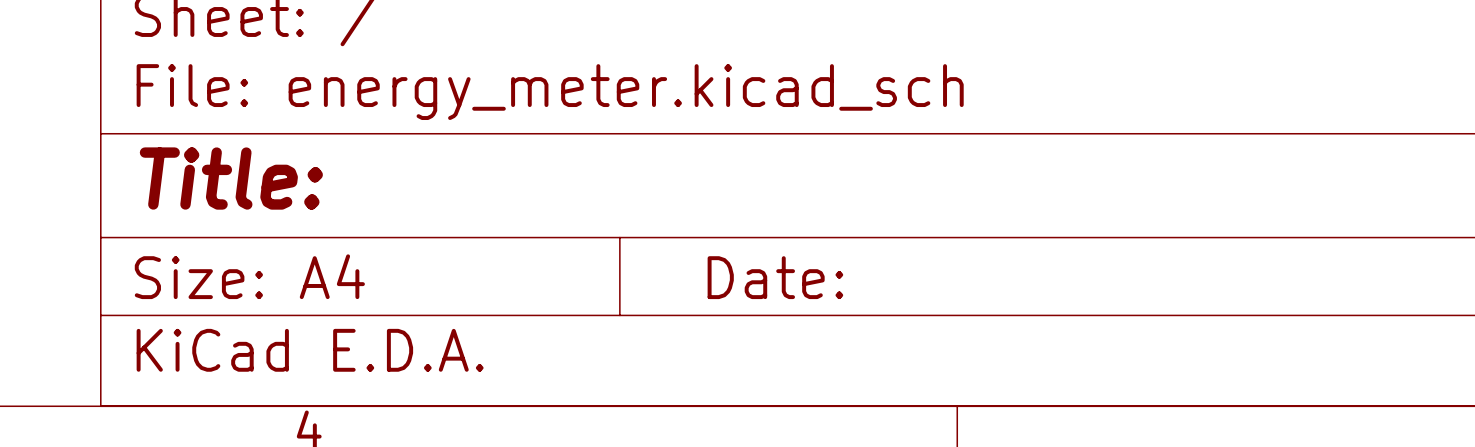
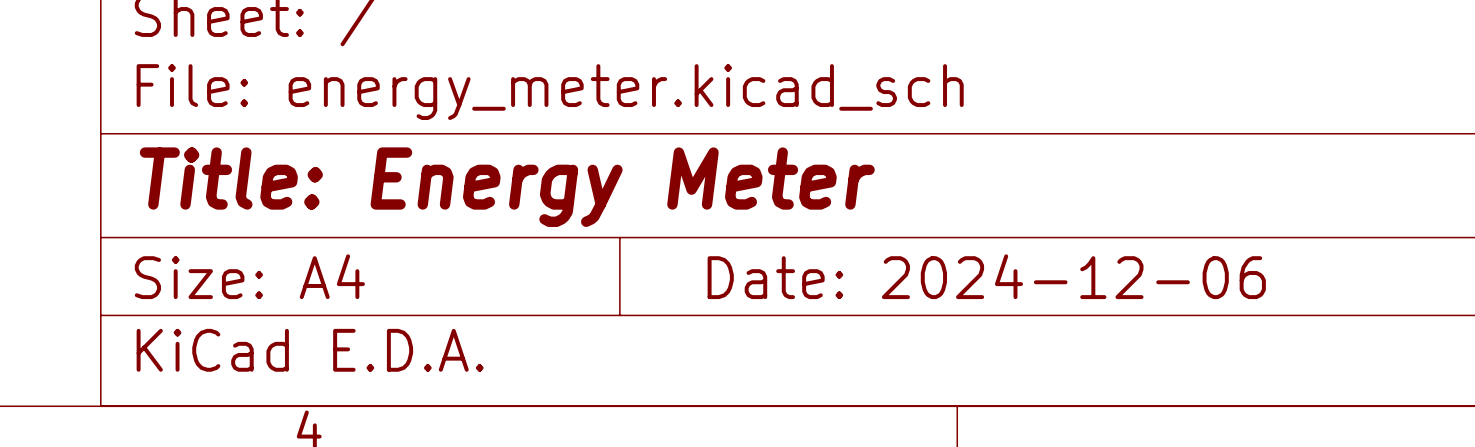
title block: Title: (231, 178) -> Title: Energy Meter (507, 187)
title block: Date: (775, 277) -> Date: 2024-12-06 (986, 276)

